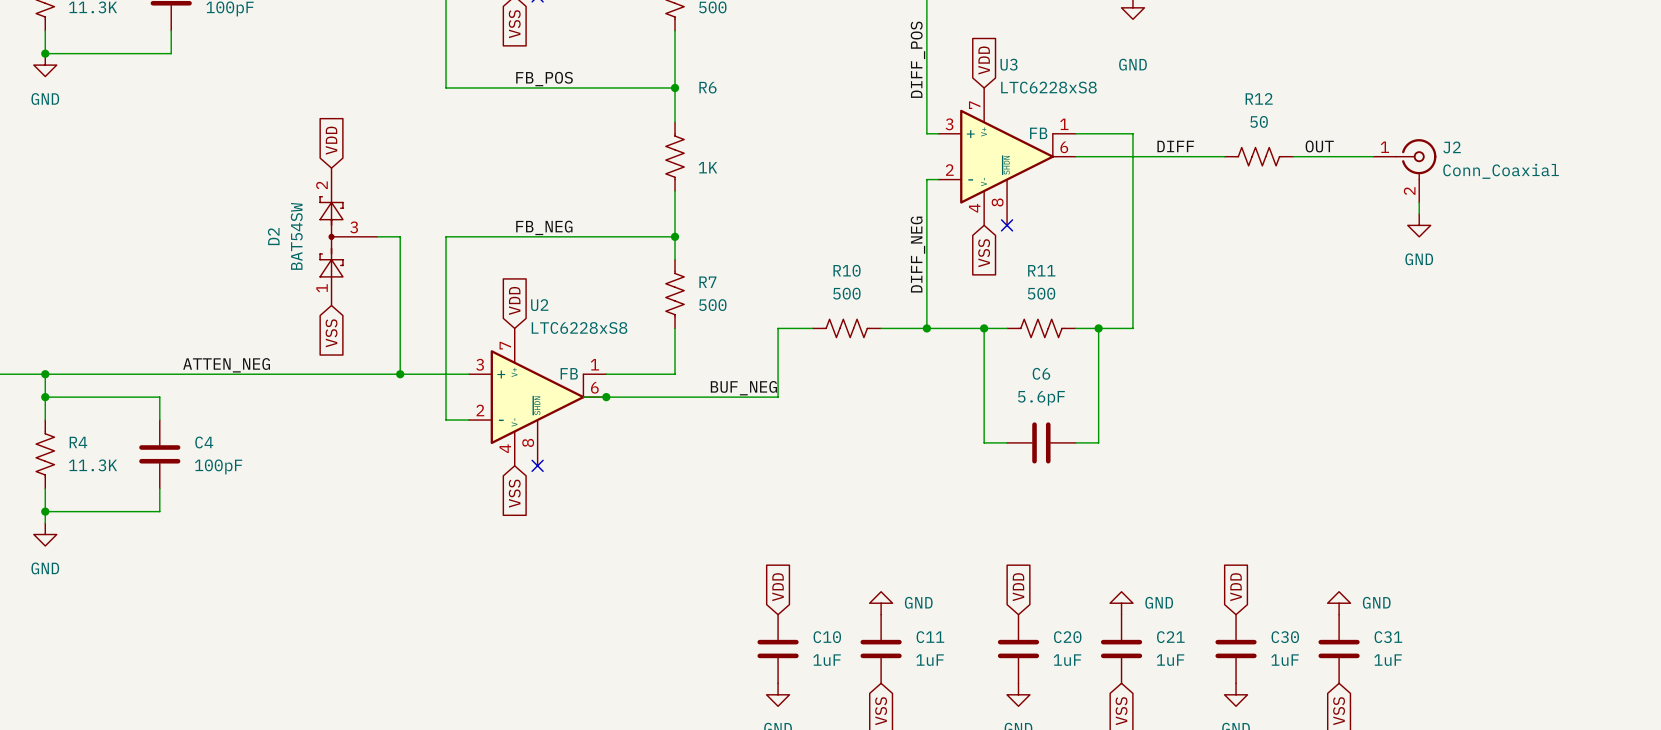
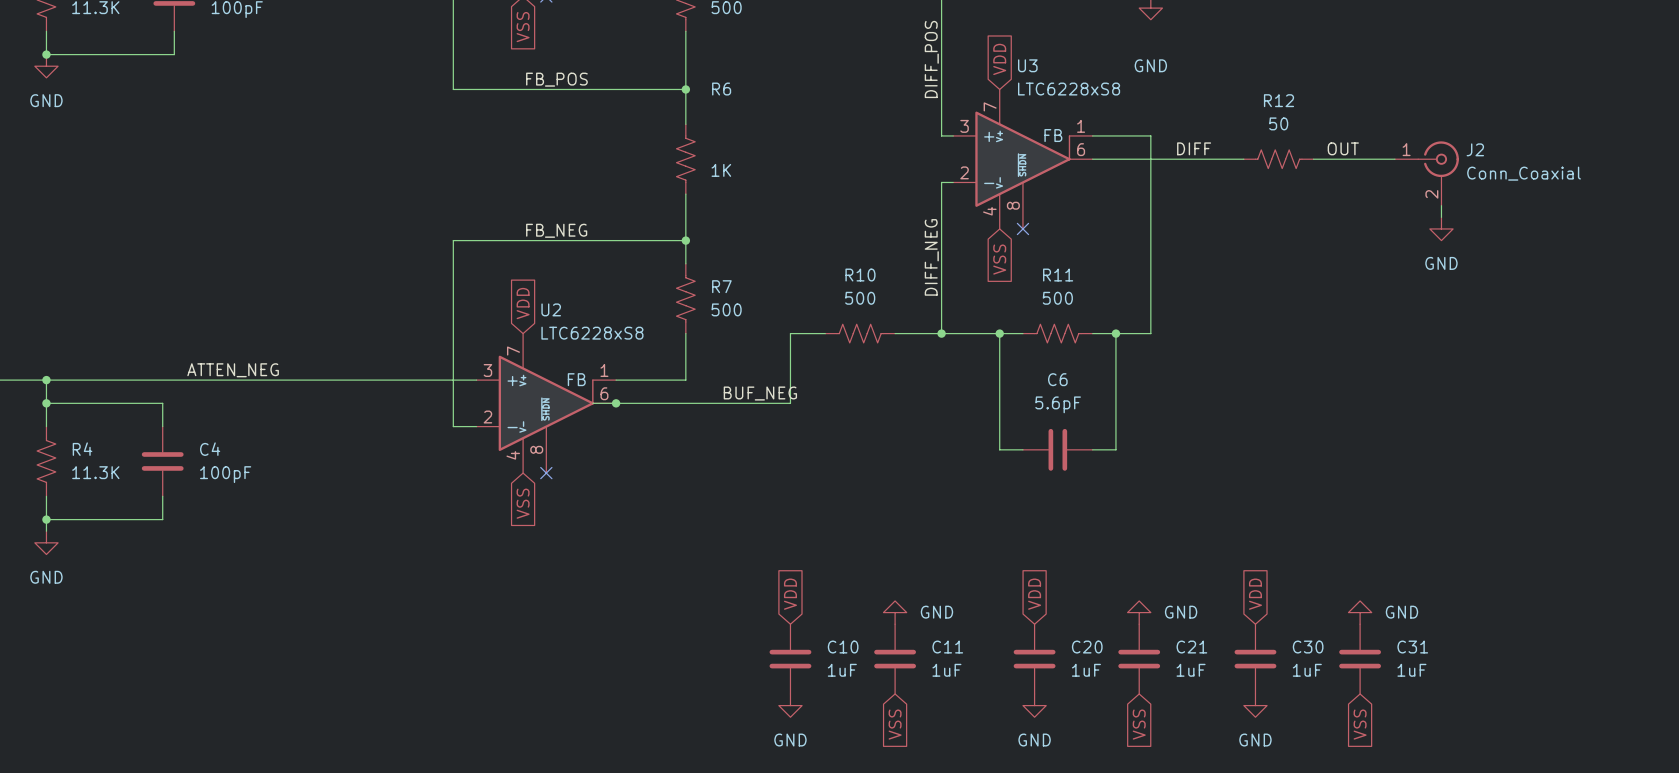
global label: VDD (331, 140) -> none
D2: BAT54SW (348, 236) -> none
wire: (377, 236) (400, 236) (400, 374) -> none
global label: VSS (331, 333) -> none
junction: (400, 374) -> none

